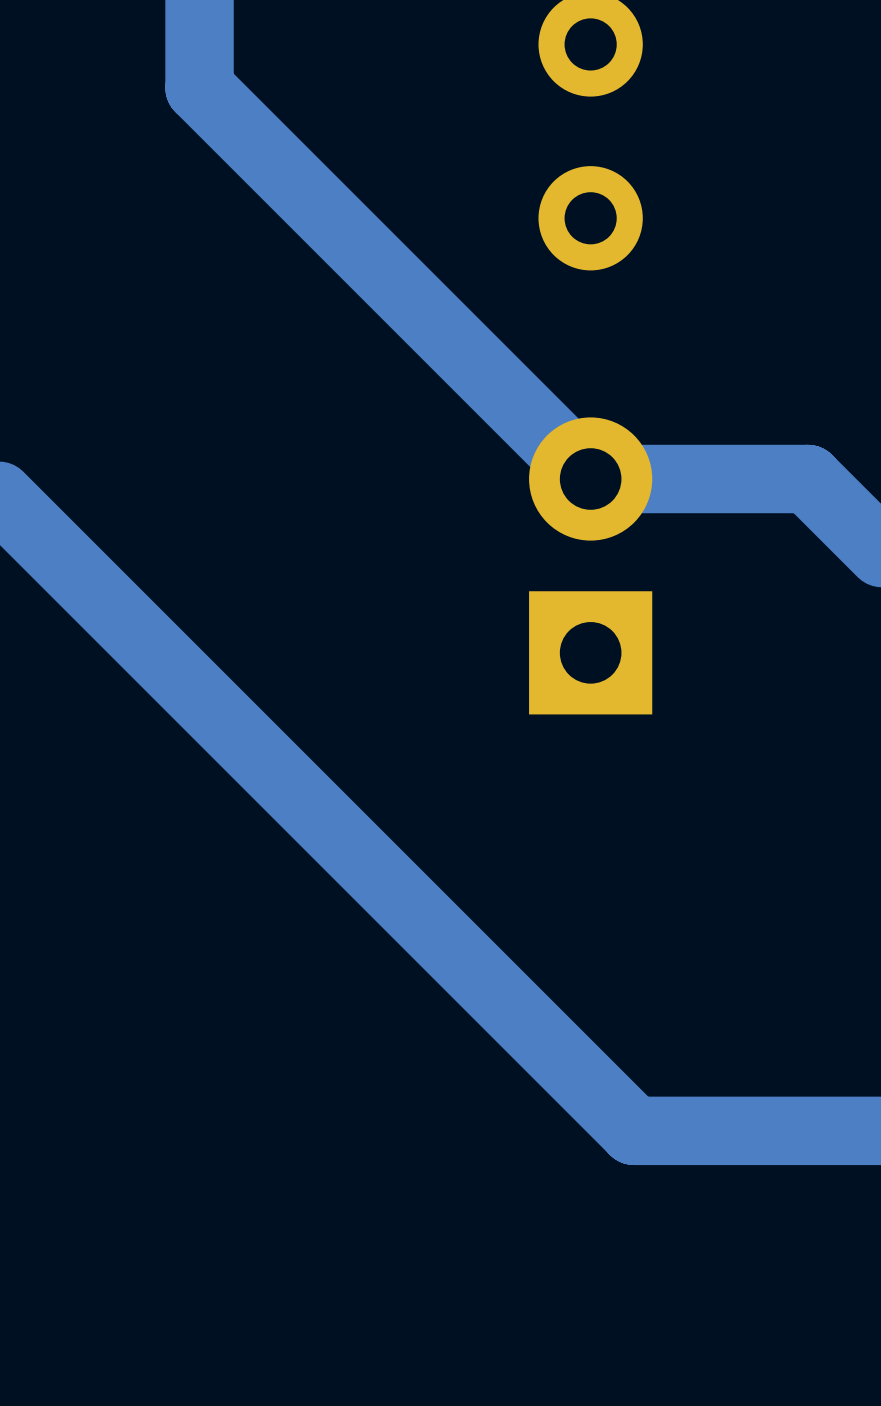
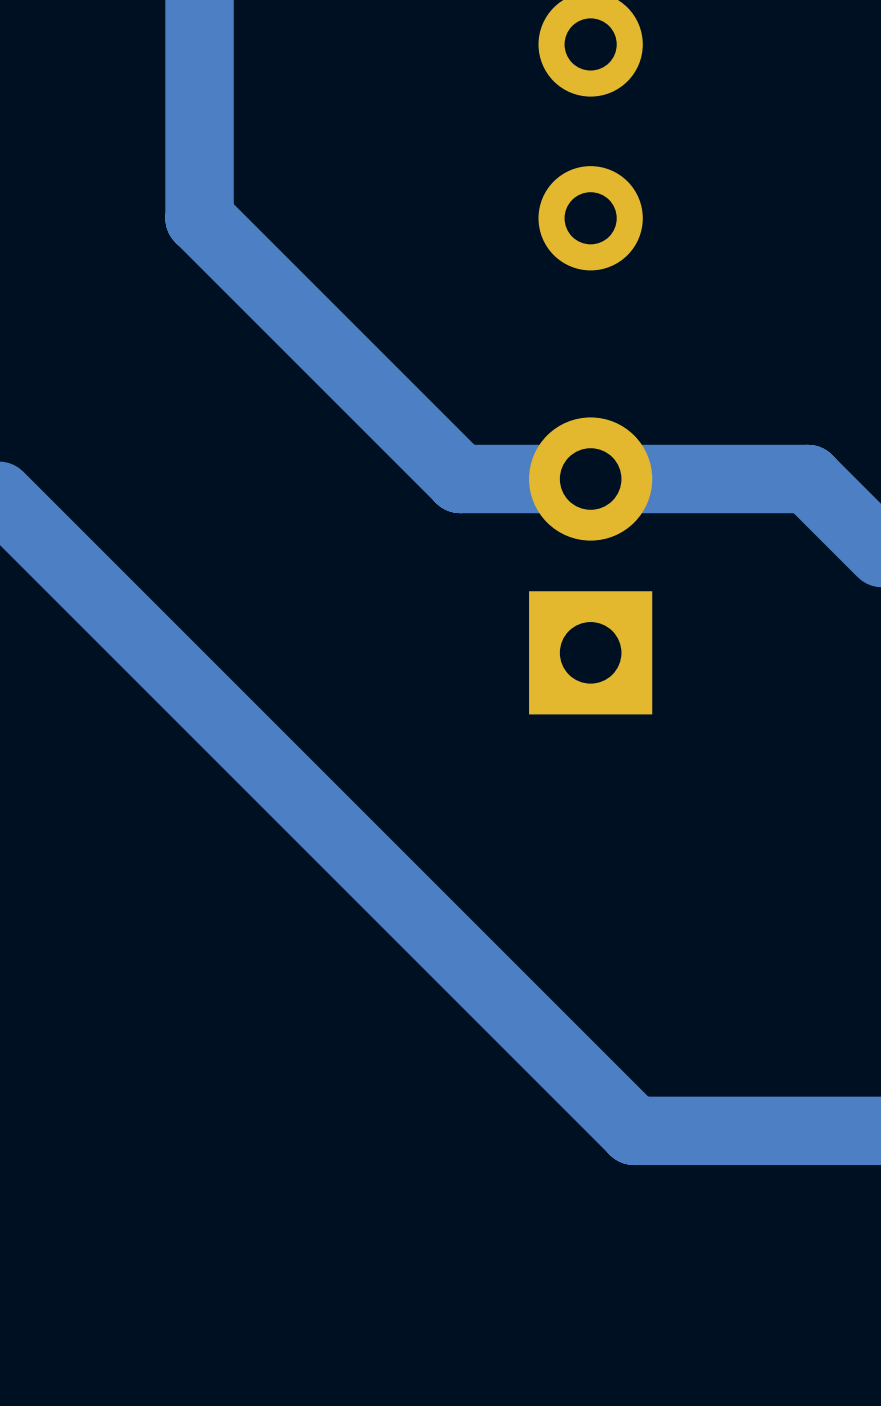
bottom track: (199, 87) (590, 479) -> (199, 87) (199, 218) (460, 479) (590, 479)

